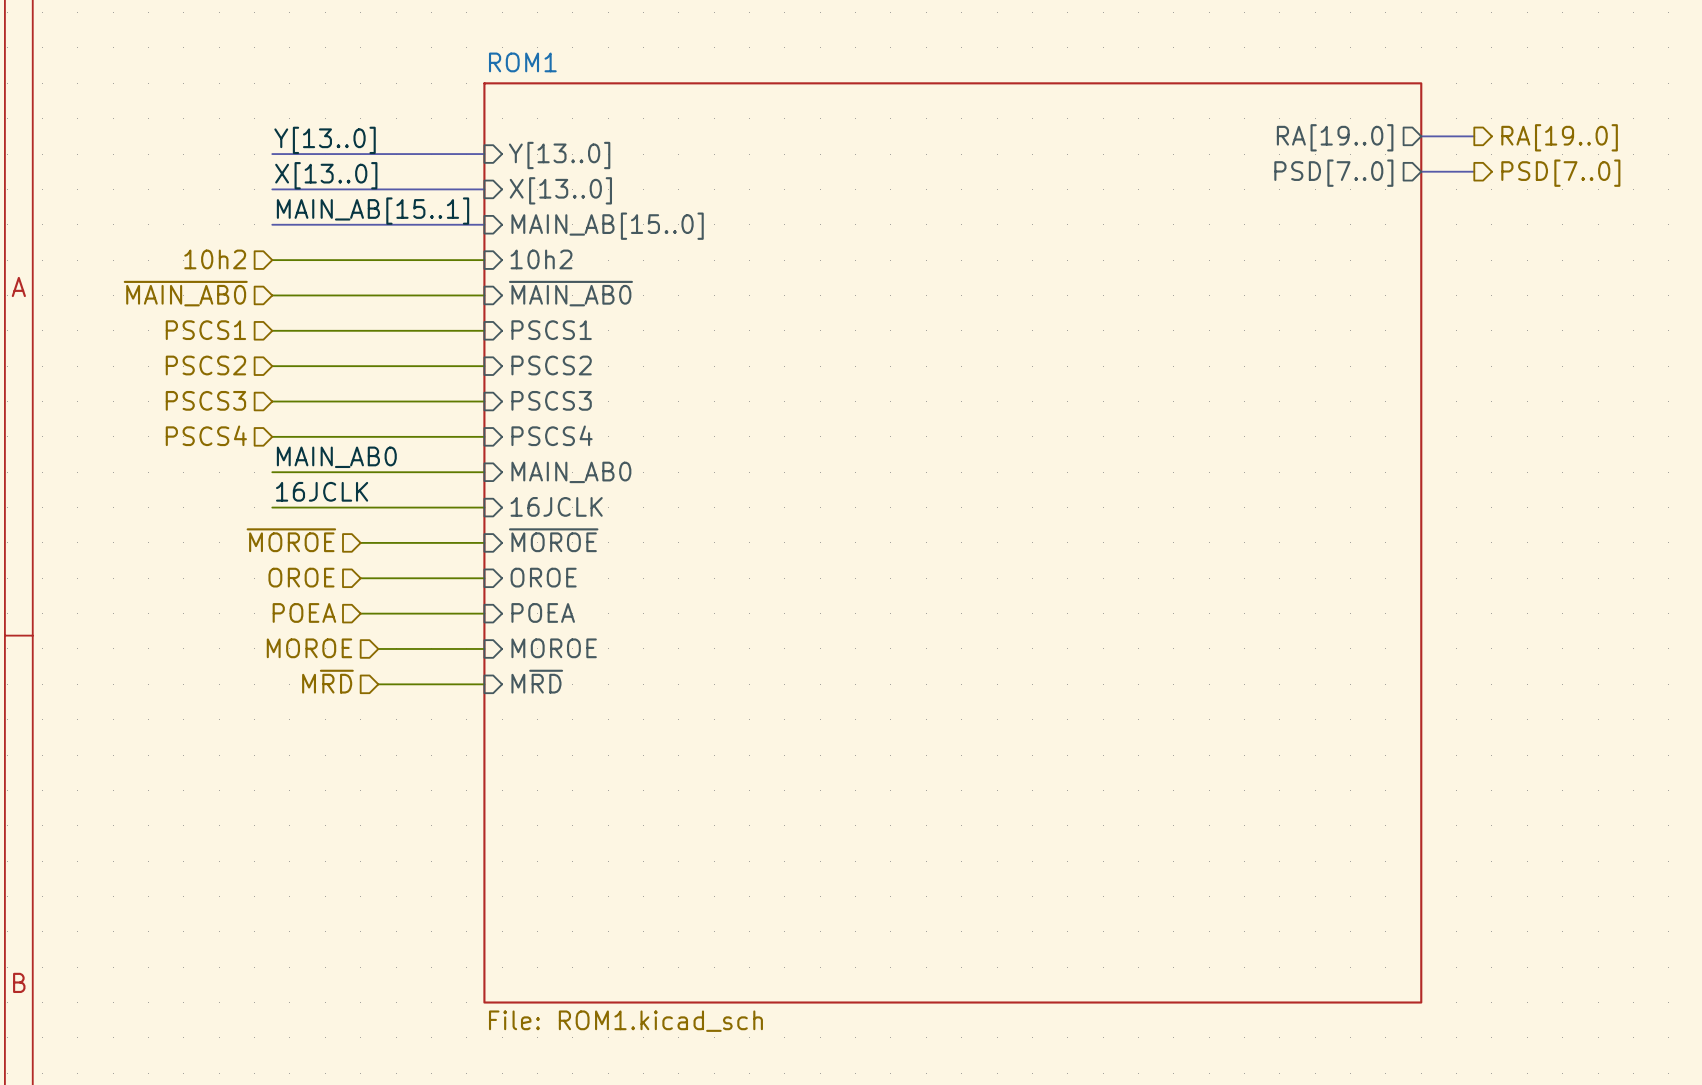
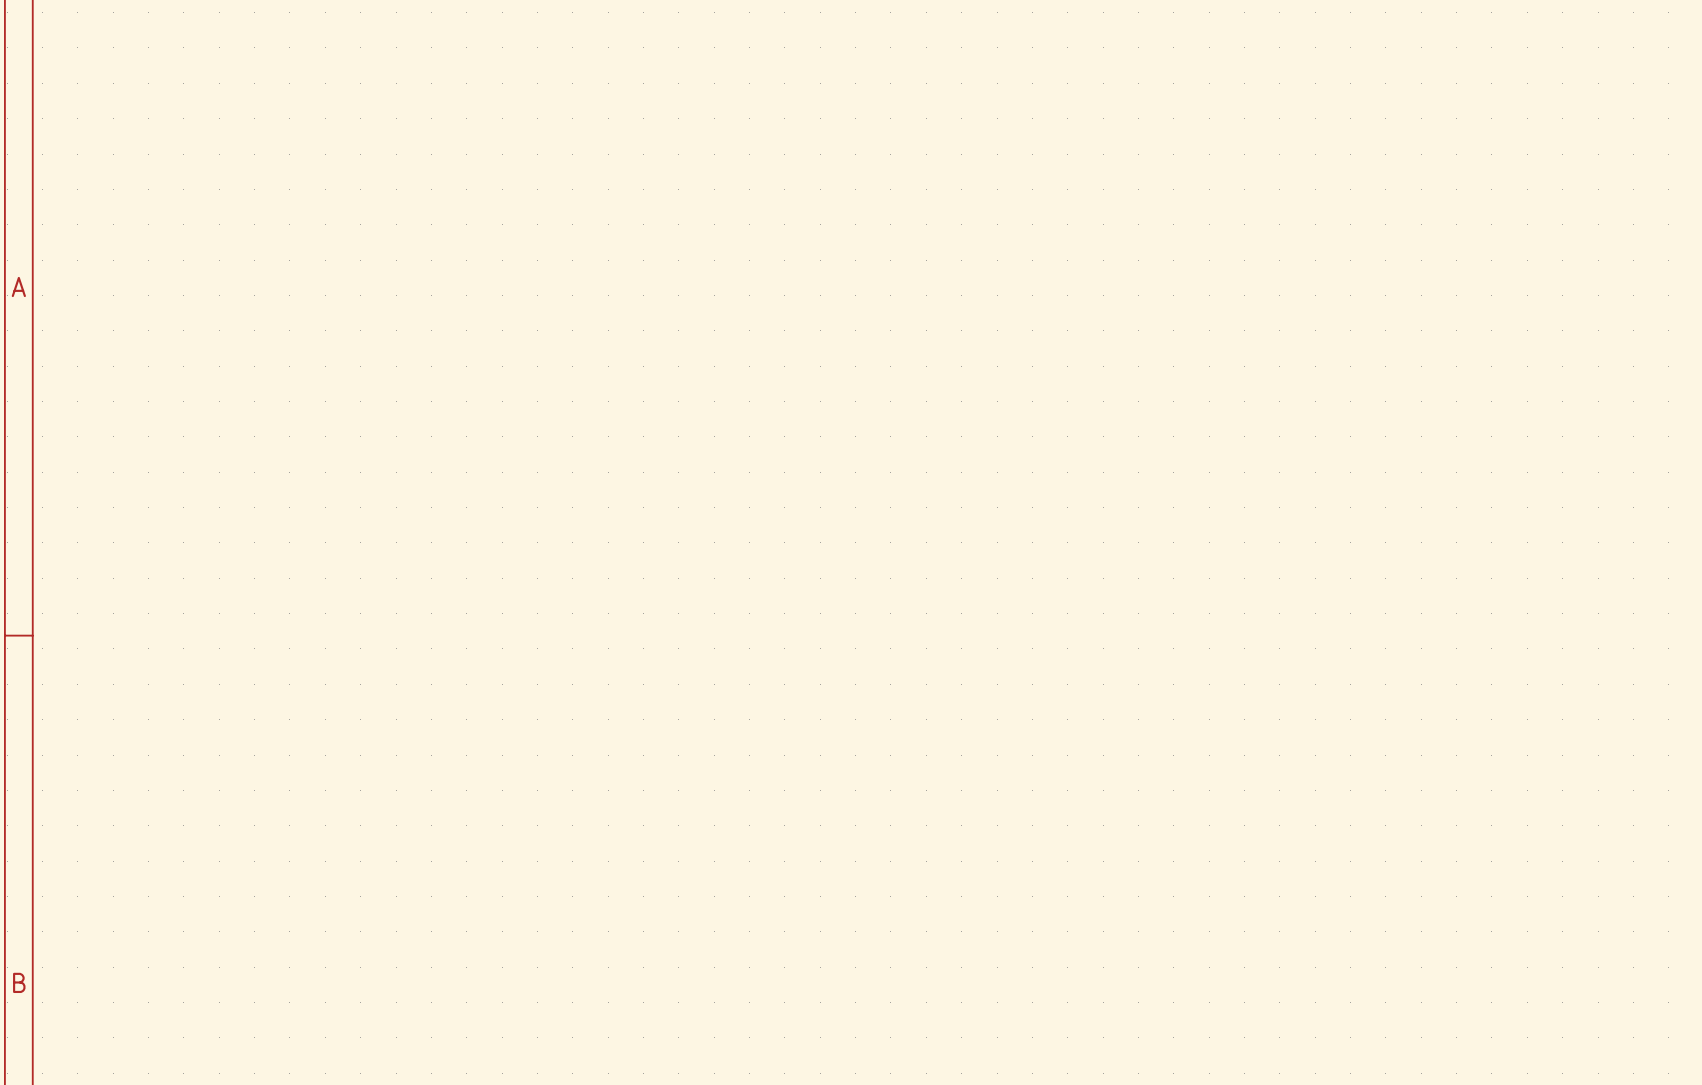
bus: (1421, 136) (1474, 136) -> none
sheet pin: RA[19..0] (1335, 137) -> none
hierarchical label: RA[19..0] (1559, 137) -> none
label: Y[13..0] (325, 140) -> none
bus: (272, 154) (484, 154) -> none
sheet pin: Y[13..0] (559, 155) -> none
bus: (1421, 171) (1474, 171) -> none
sheet pin: PSD[7..0] (1333, 173) -> none
hierarchical label: PSD[7..0] (1560, 173) -> none
label: X[13..0] (326, 175) -> none
bus: (272, 189) (484, 189) -> none
sheet pin: X[13..0] (560, 190) -> none
label: MAIN_AB[15..1] (373, 211) -> none
bus: (272, 224) (484, 224) -> none
sheet pin: MAIN_AB[15..0] (607, 226) -> none
hierarchical label: 10h2 (215, 259) -> none
sheet pin: 10h2 (541, 259) -> none
wire: (272, 260) (484, 260) -> none
hierarchical label: ~{MAIN_AB0} (185, 293) -> none
sheet pin: ~{MAIN_AB0} (570, 293) -> none
wire: (272, 295) (484, 295) -> none
hierarchical label: PSCS1 (205, 330) -> none
wire: (272, 330) (484, 330) -> none
sheet pin: PSCS1 (551, 330) -> none
hierarchical label: PSCS2 (205, 365) -> none
sheet pin: PSCS2 (551, 365) -> none
wire: (272, 366) (484, 366) -> none
hierarchical label: PSCS3 (205, 400) -> none
sheet pin: PSCS3 (551, 400) -> none
wire: (272, 401) (484, 401) -> none
hierarchical label: PSCS4 (206, 435) -> none
sheet pin: PSCS4 (552, 435) -> none
wire: (272, 436) (484, 436) -> none
label: MAIN_AB0 (336, 457) -> none
wire: (272, 472) (484, 472) -> none
sheet pin: MAIN_AB0 (571, 472) -> none
label: 16JCLK (322, 491) -> none
sheet pin: 16JCLK (556, 506) -> none
wire: (272, 507) (484, 507) -> none
hierarchical label: ~{MOROE} (291, 540) -> none
sheet pin: ~{MOROE} (553, 540) -> none
wire: (360, 542) (484, 542) -> none
sheet ROM1: File: ROM1.kicad_sch (952, 542) -> none
hierarchical label: OROE (301, 577) -> none
sheet pin: OROE (543, 577) -> none
wire: (360, 578) (484, 578) -> none
hierarchical label: POEA (304, 612) -> none
sheet pin: POEA (543, 612) -> none
wire: (360, 613) (484, 613) -> none
hierarchical label: MOROE (309, 648) -> none
wire: (378, 648) (484, 648) -> none
sheet pin: MOROE (554, 648) -> none
hierarchical label: M~{RD} (327, 681) -> none
sheet pin: M~{RD} (537, 681) -> none
wire: (378, 684) (484, 684) -> none

